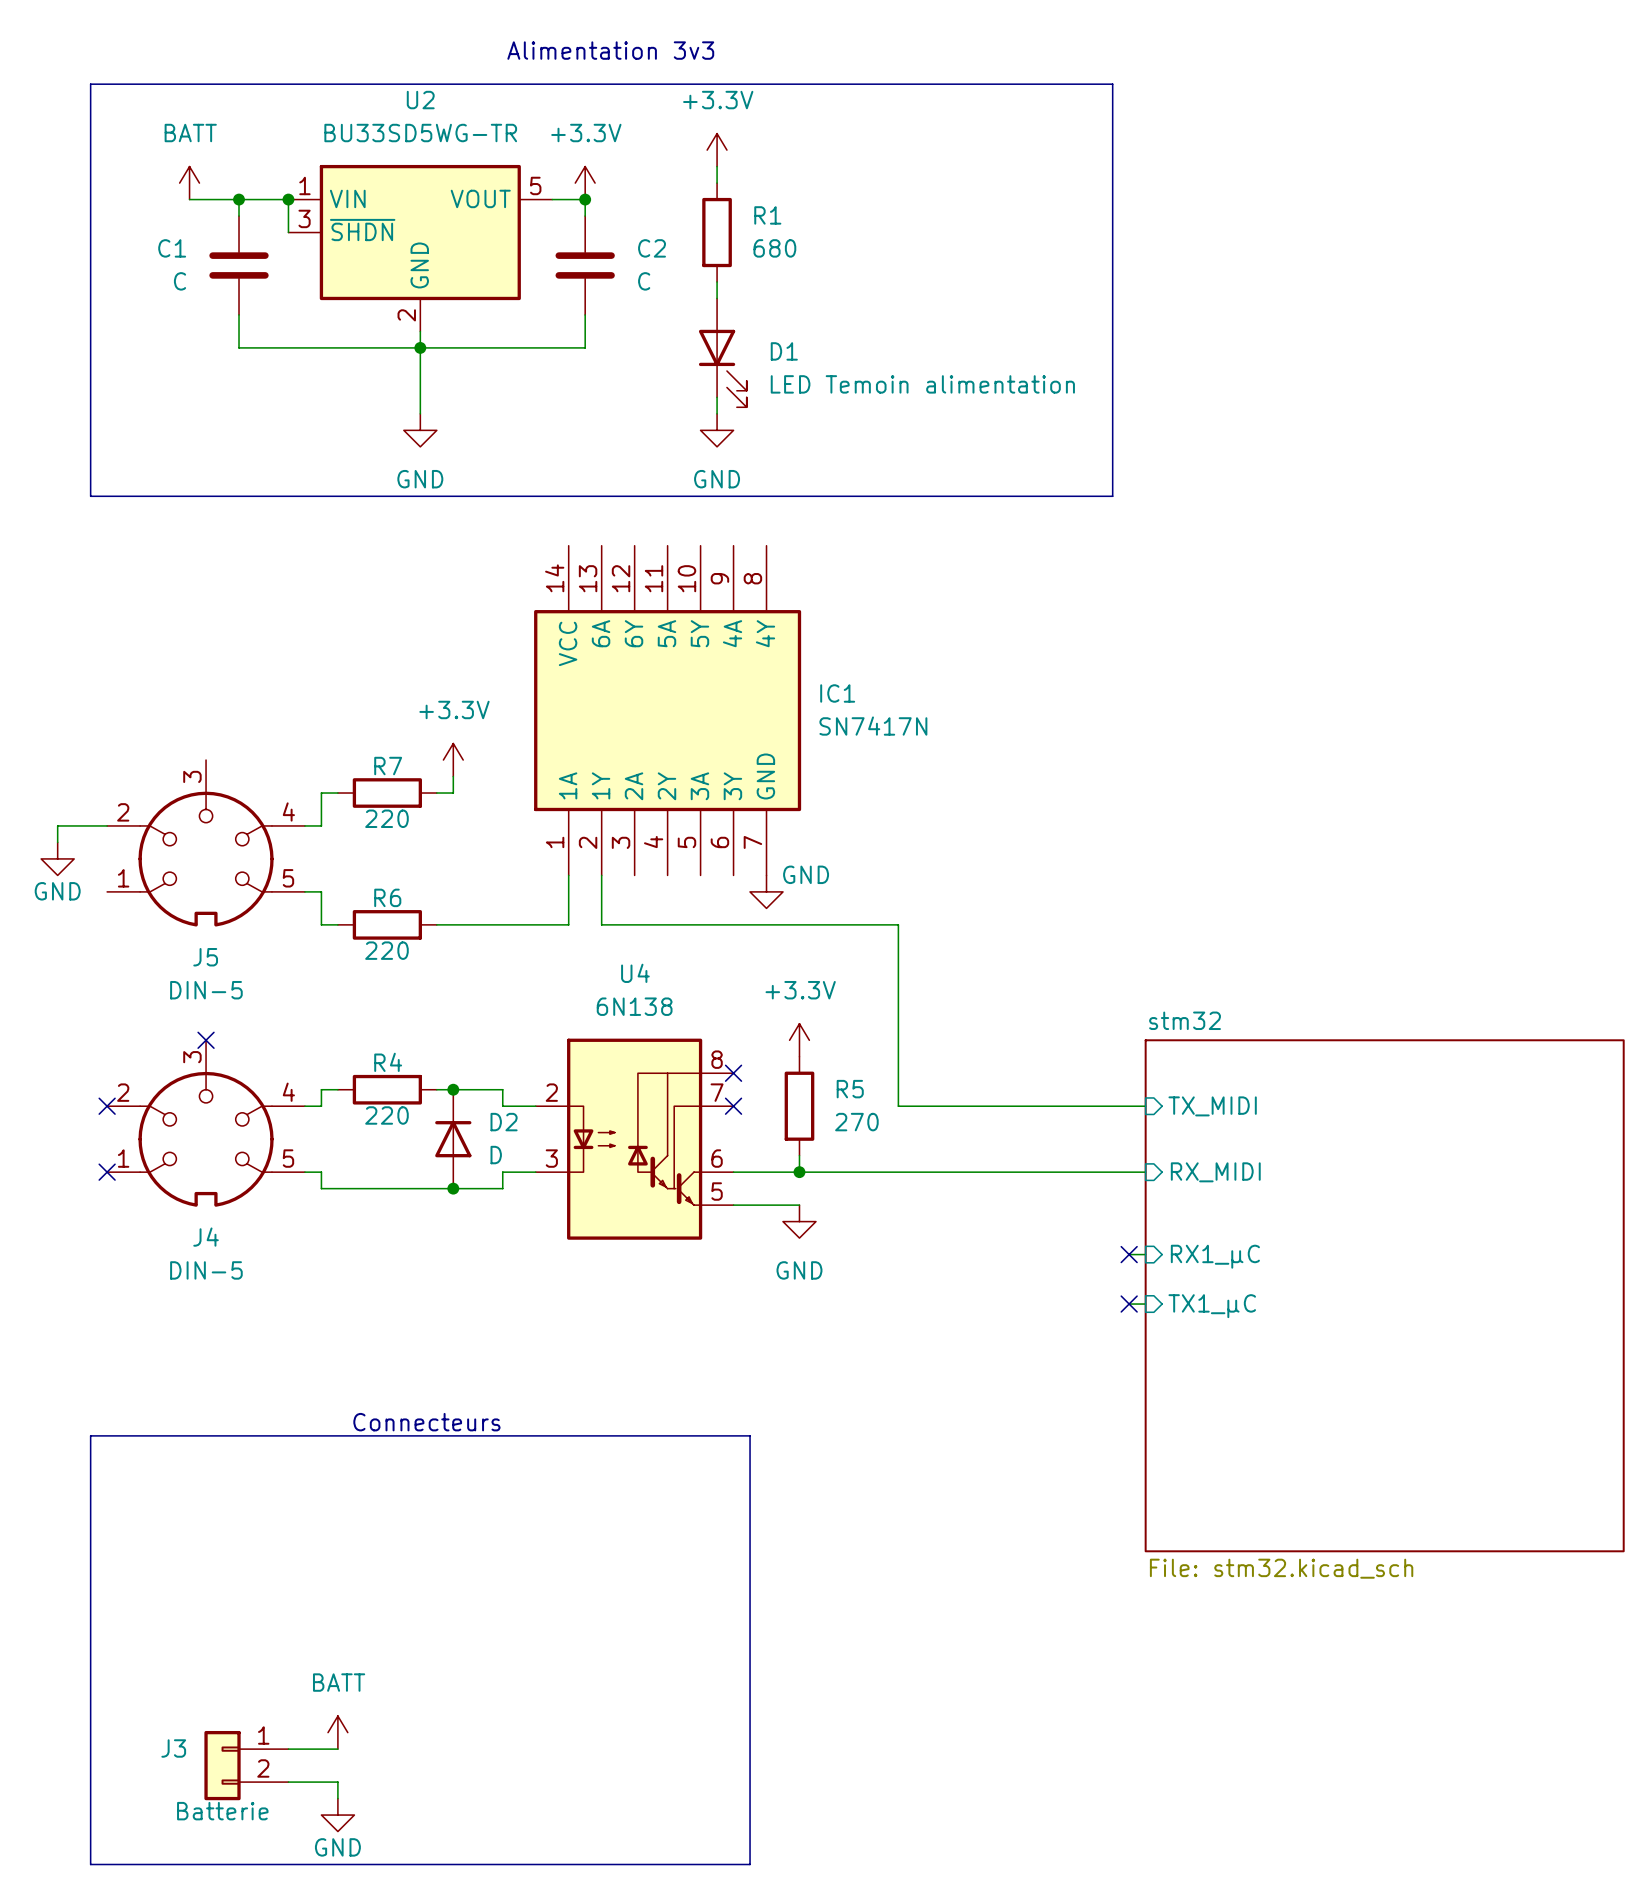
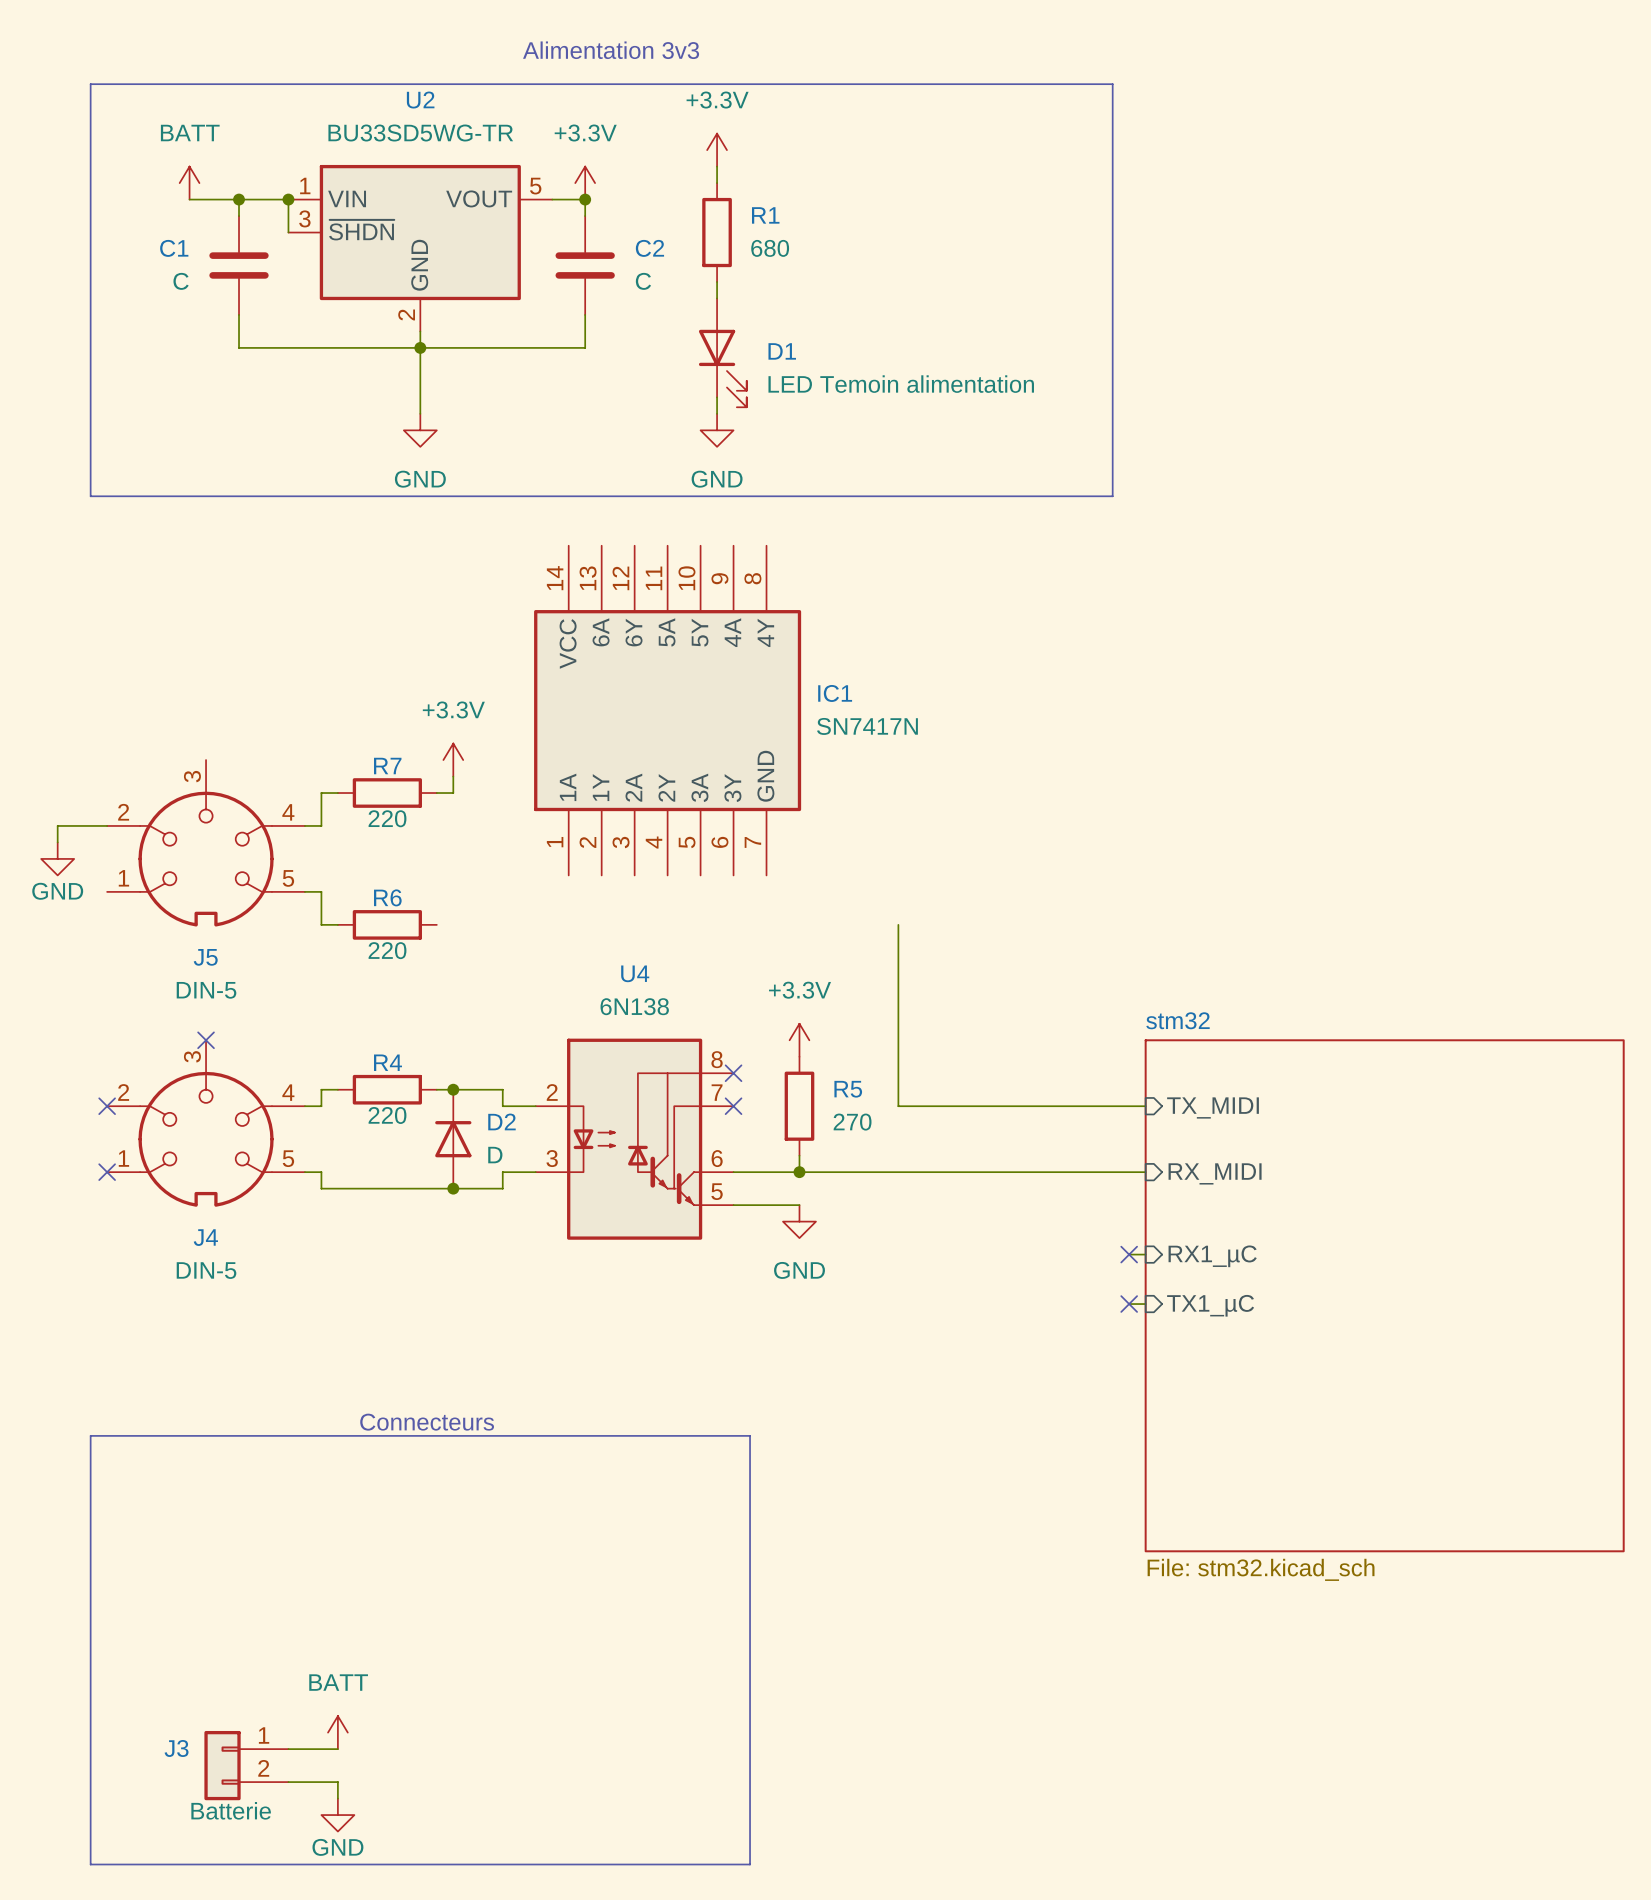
wire: (568, 875) (568, 924) (436, 924) -> none
wire: (601, 875) (601, 924) (898, 924) -> none
power symbol: GND (766, 891) -> none

